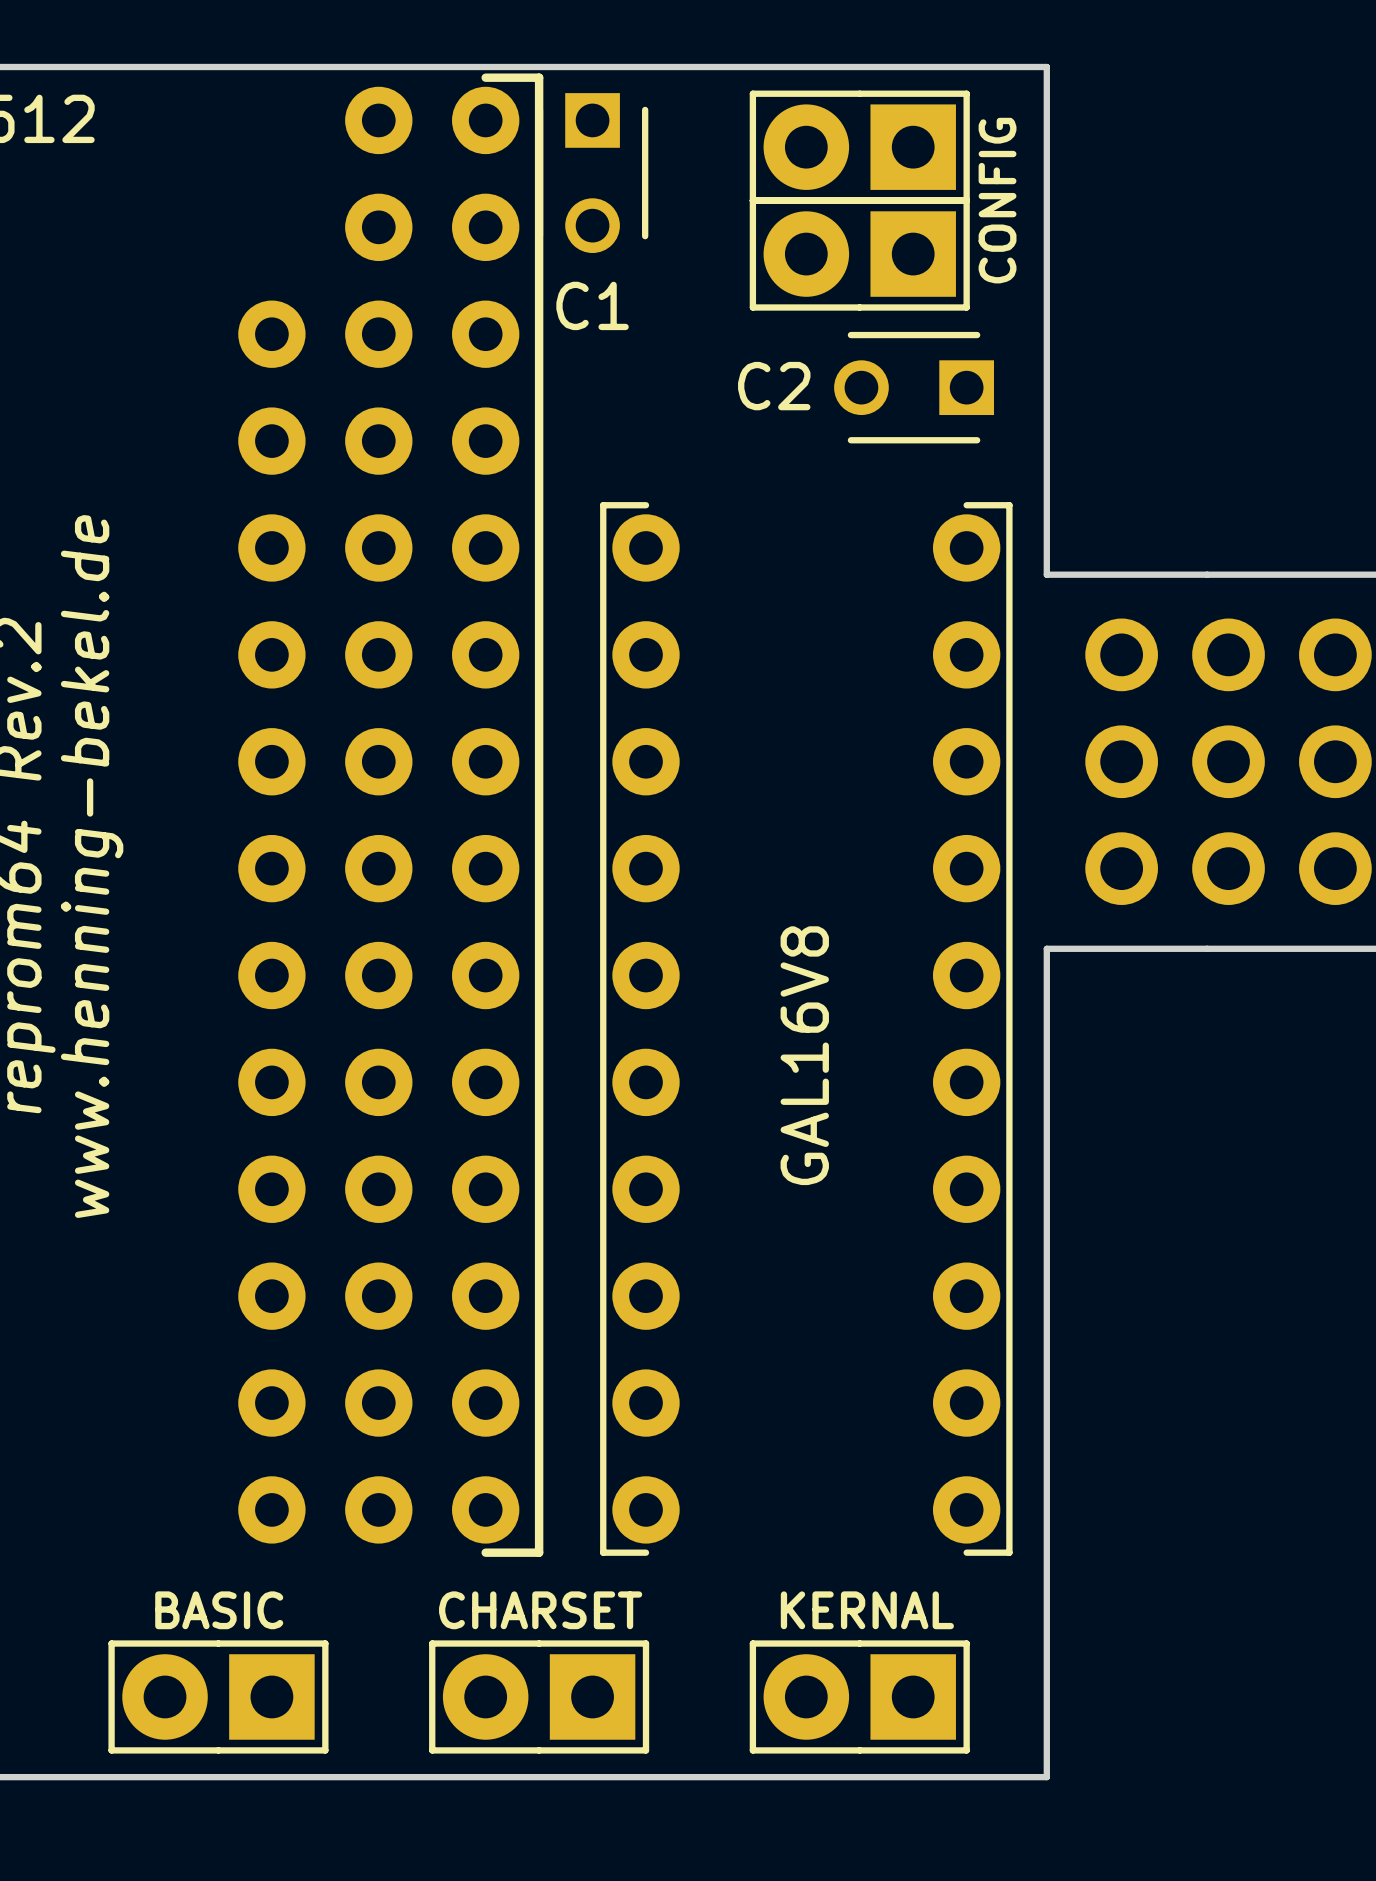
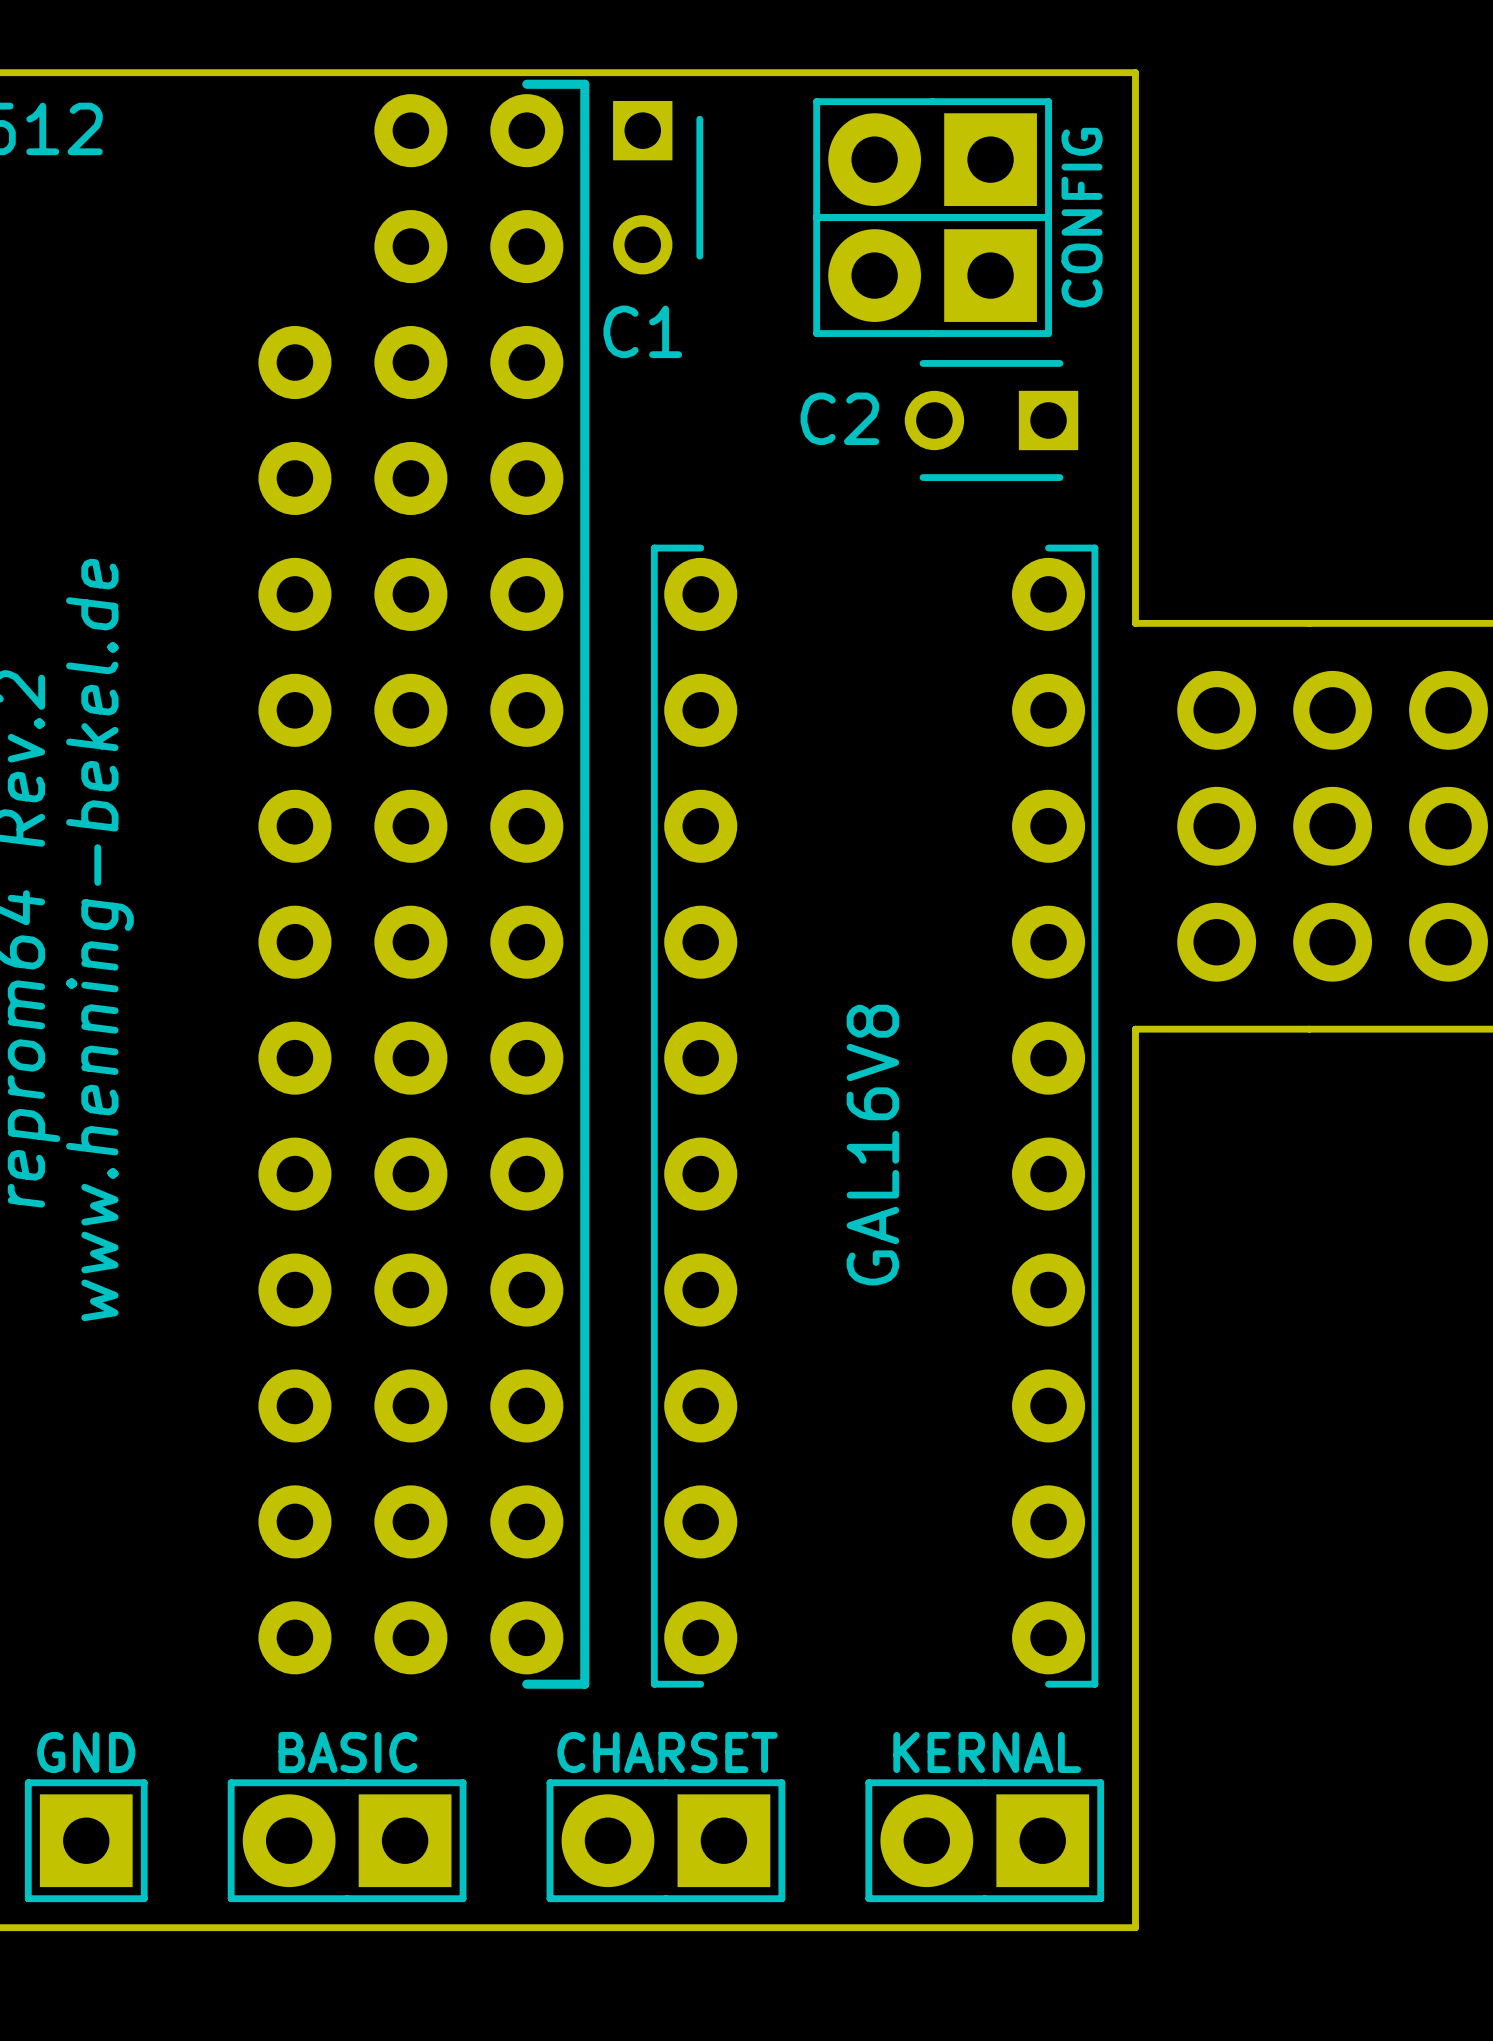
text position: BASIC (219, 1610) -> BASIC (347, 1752)
text position: CHARSET (540, 1610) -> CHARSET (667, 1752)
text position: KERNAL (867, 1610) -> KERNAL (987, 1752)
text: none -> GND (86, 1752)
part: none -> (86, 1840)
part position: (218, 1696) -> (347, 1840)
part position: (539, 1696) -> (665, 1840)
part position: (859, 1696) -> (984, 1840)

